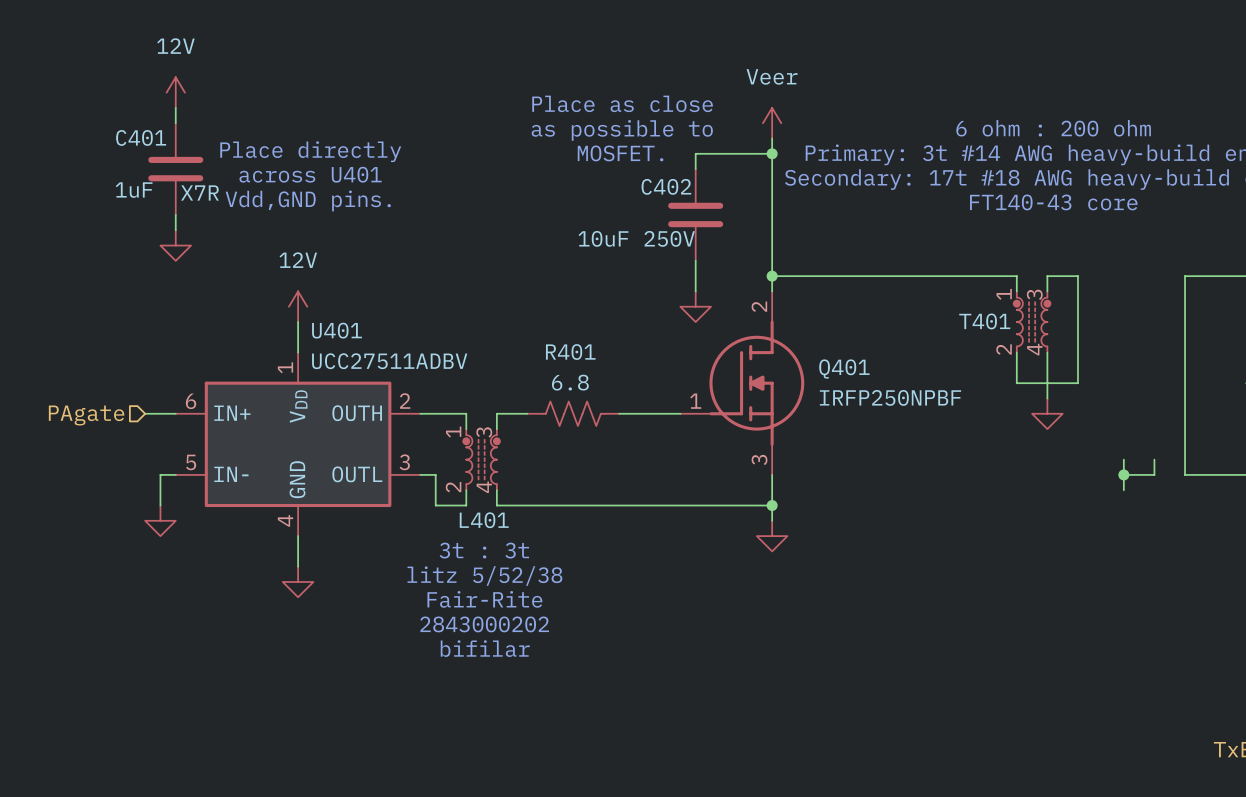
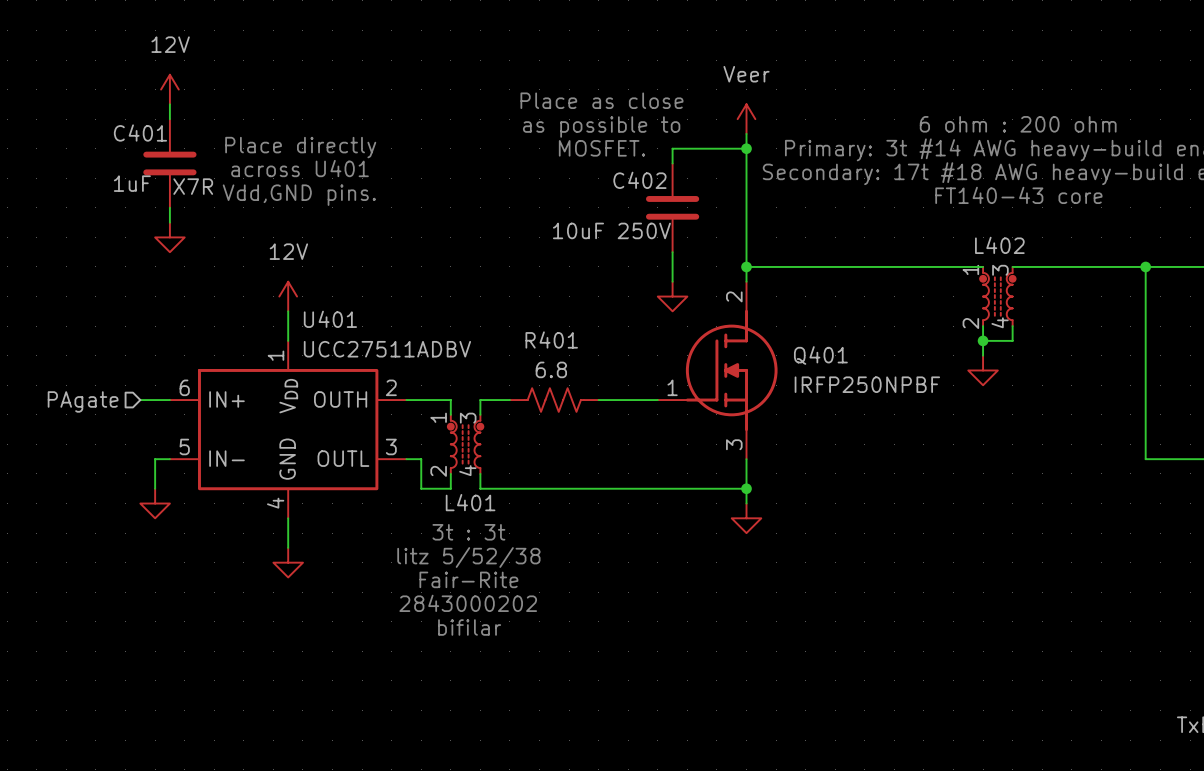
wire: (1077, 276) (1077, 383) (1016, 383) (1016, 367) -> (1042, 266) (1145, 266)
junction: none -> (1145, 266)
L402: none -> (997, 296)
T401: (1032, 322) -> none
wire: none -> (983, 326) (983, 340) (1012, 340) (1012, 326)
junction: none -> (983, 340)
wire: (1047, 352) (1047, 398) -> none
power symbol position: (1047, 413) -> (983, 370)
wire: (1123, 459) (1123, 490) -> none
wire: (1154, 459) (1154, 474) (1123, 474) -> none
junction: (1123, 474) -> none

